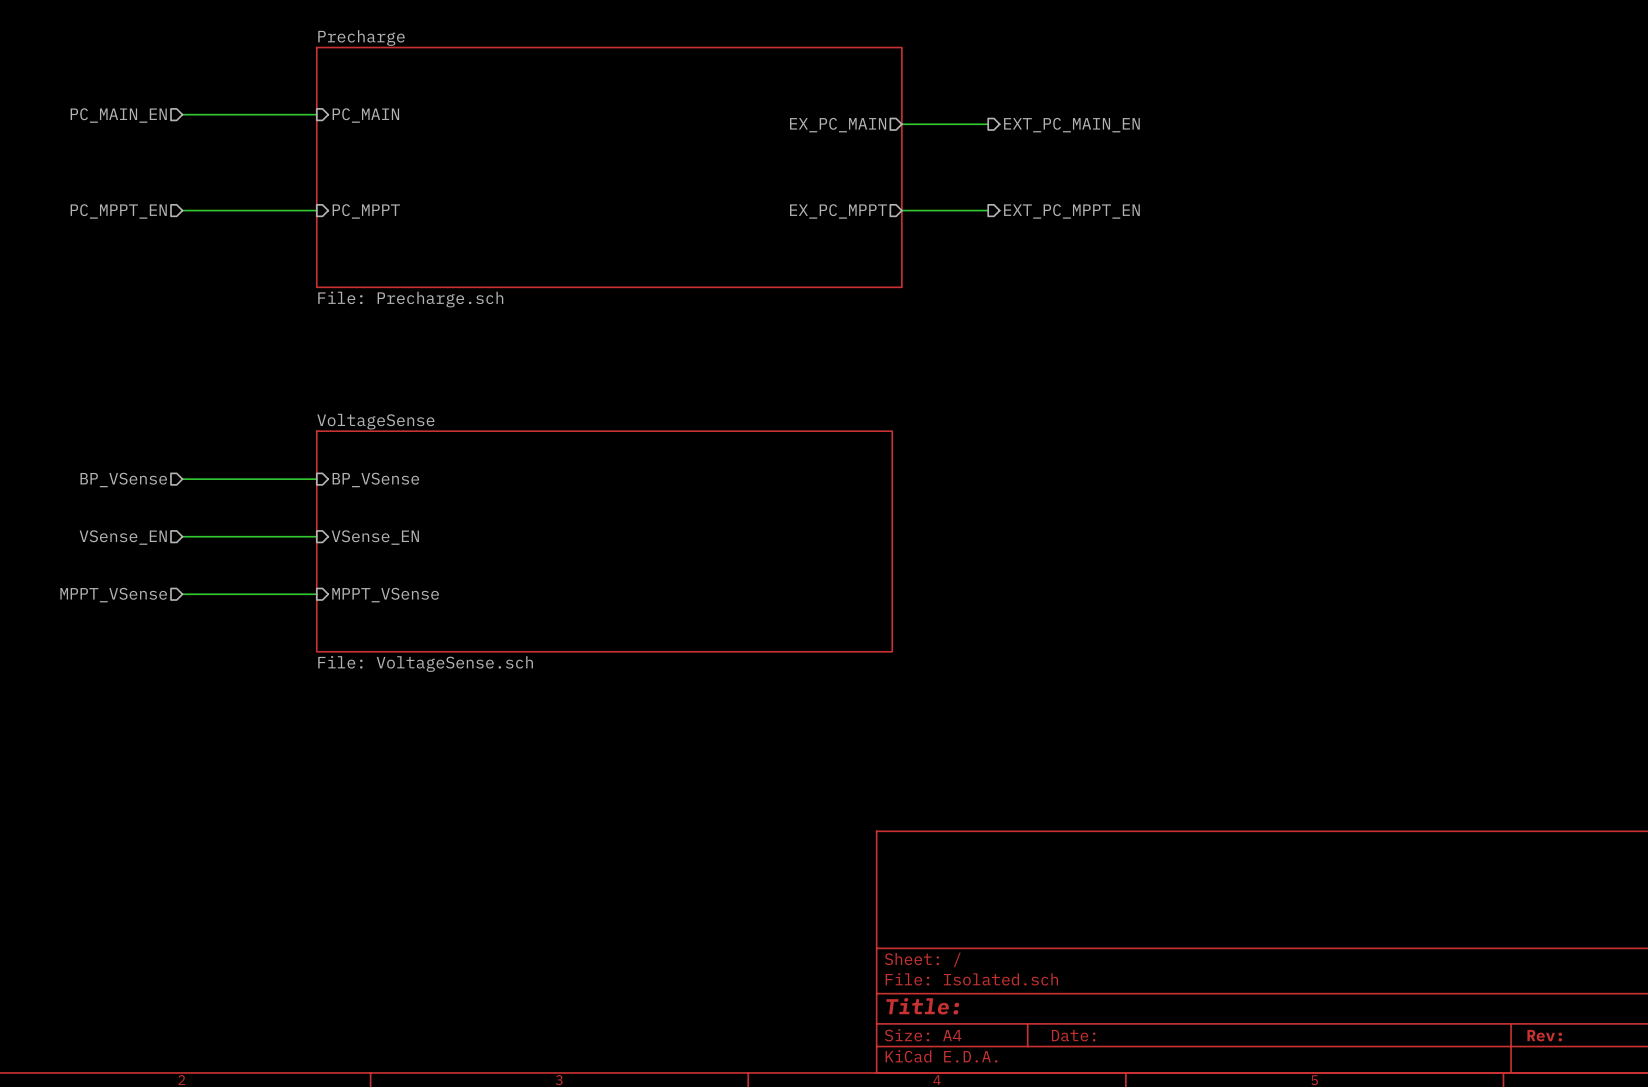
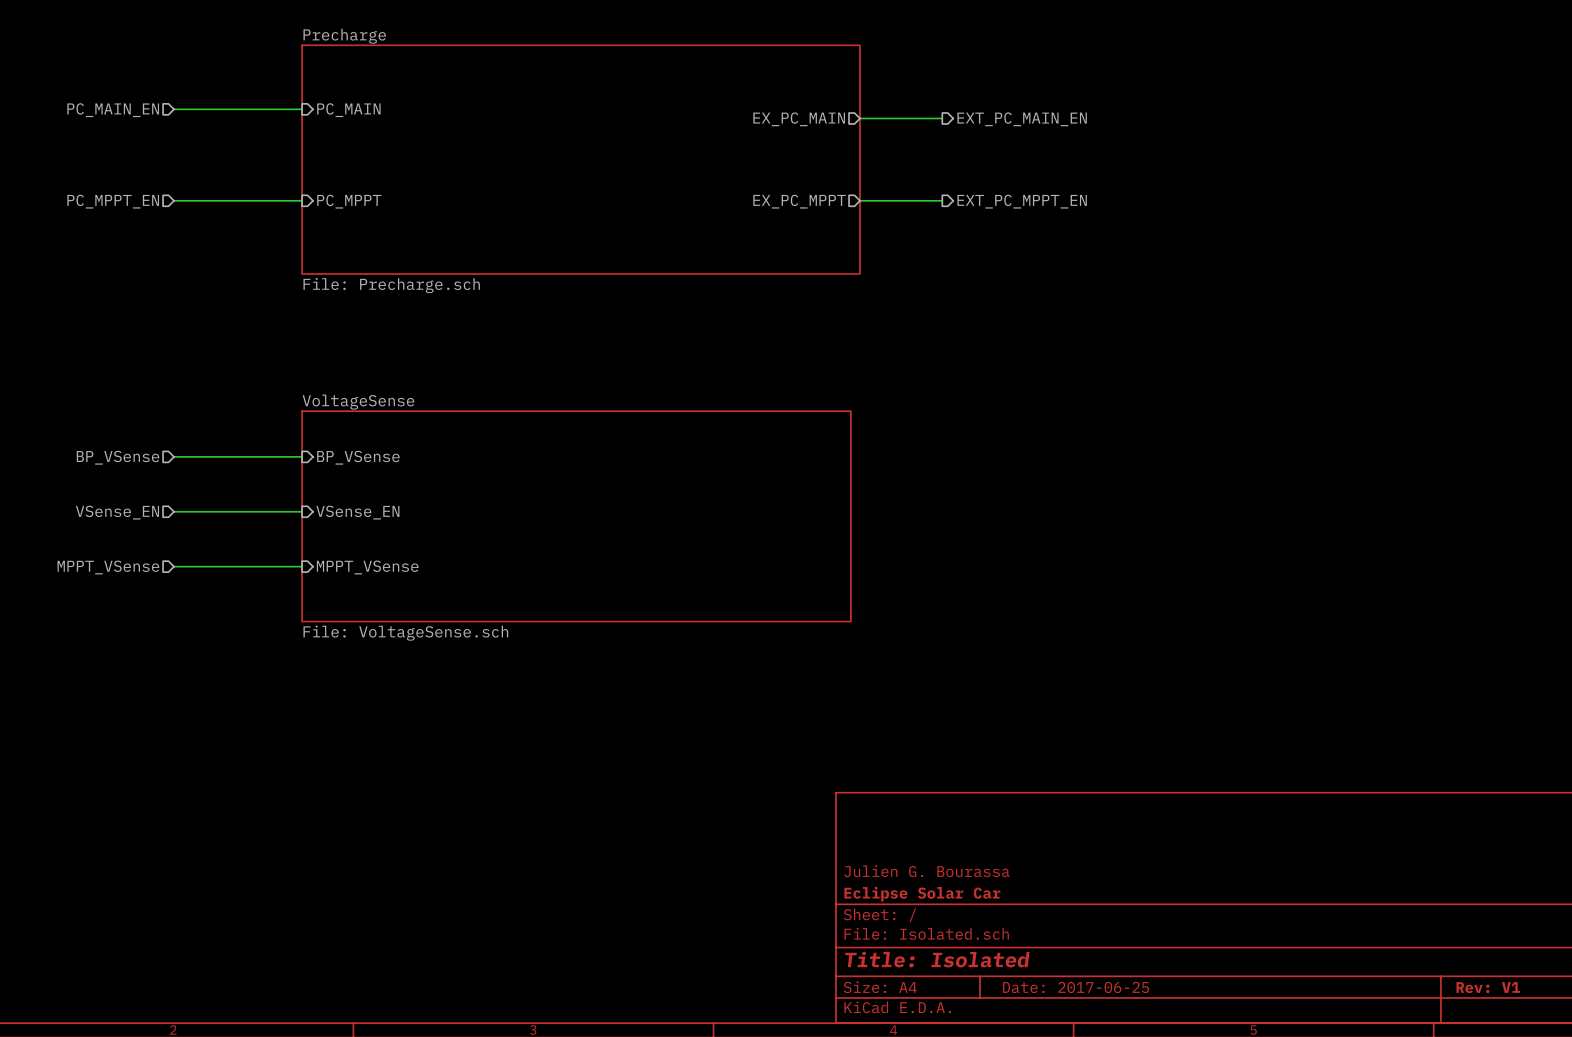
title block: none -> Julien G. Bourassa (926, 871)
title block: none -> Eclipse Solar Car (922, 894)
title block: Title: (922, 1006) -> Title: Isolated (937, 959)
title block: Date: (1073, 1035) -> Date: 2017-06-25 (1076, 987)
title block: Rev: (1544, 1035) -> Rev: V1 (1488, 987)

